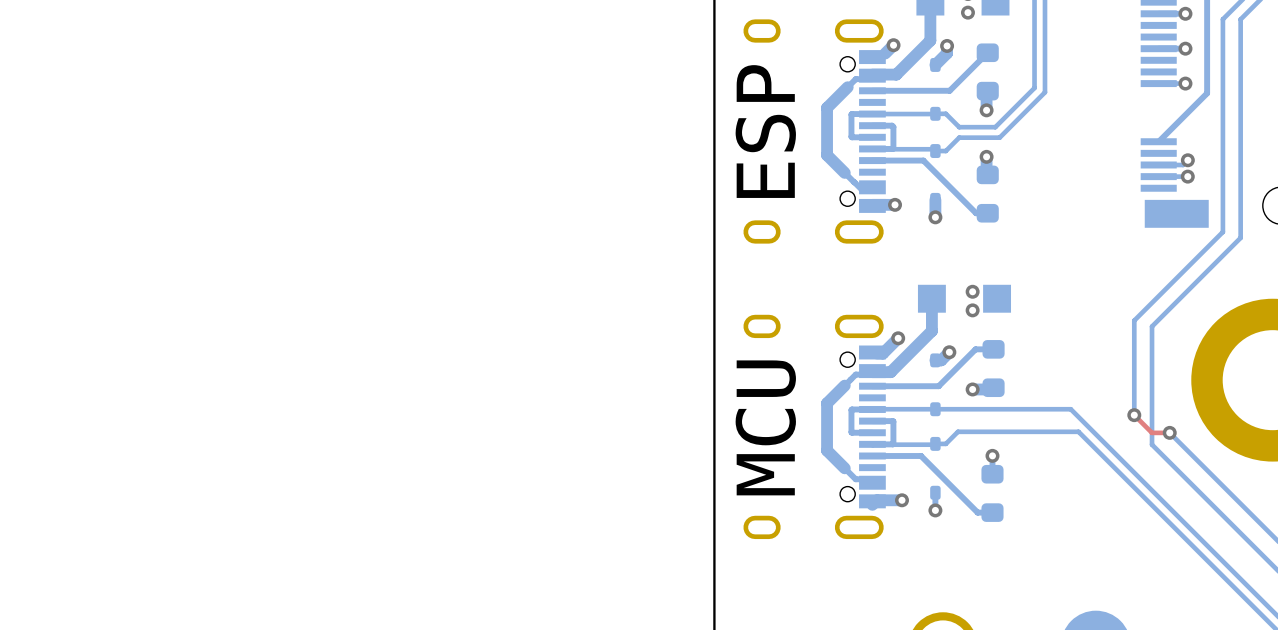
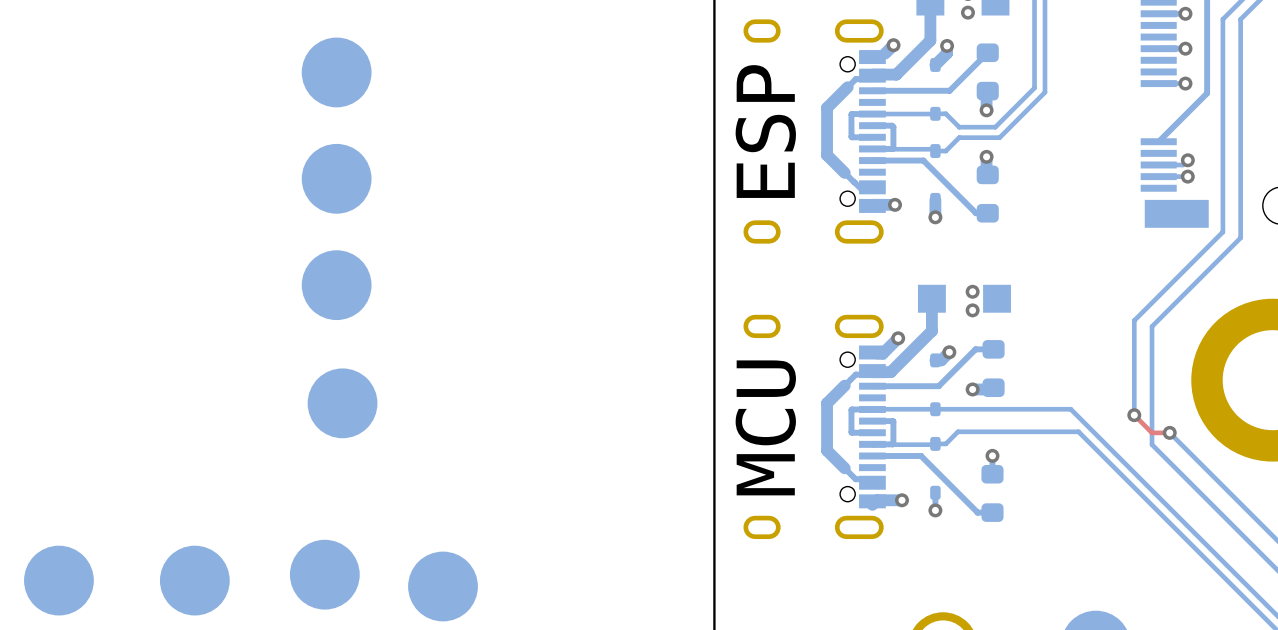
part: none -> (336, 72)
part: none -> (336, 178)
part: none -> (336, 285)
part: none -> (342, 403)
part: none -> (324, 574)
part: none -> (58, 580)
part: none -> (194, 580)
part: none -> (443, 586)

